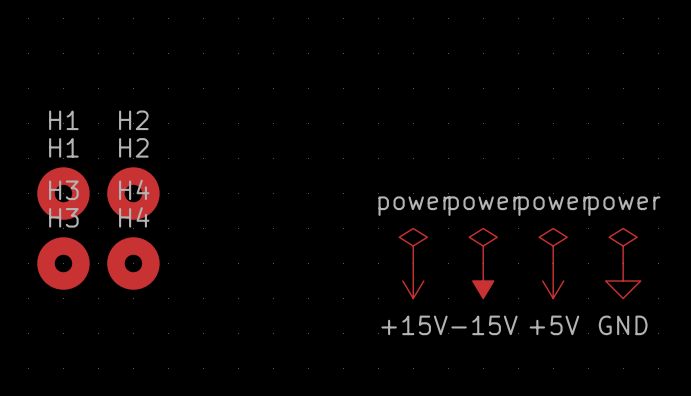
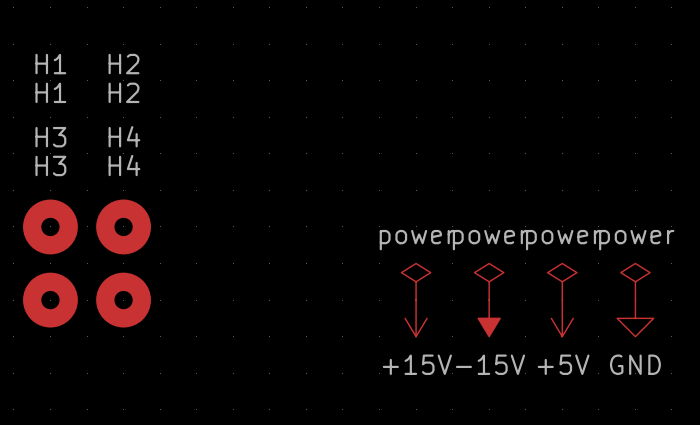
H1 name position: H1 (63, 120) -> H1 (50, 64)
H2 name position: H2 (133, 120) -> H2 (124, 64)
H1 value position: H1 (63, 147) -> H1 (50, 92)
H2 value position: H2 (133, 147) -> H2 (124, 92)
H4 name position: H4 (134, 189) -> H4 (124, 136)
H3 name position: H3 (63, 190) -> H3 (50, 137)
H3 value position: H3 (63, 217) -> H3 (50, 165)
H4 value position: H4 (134, 217) -> H4 (124, 165)

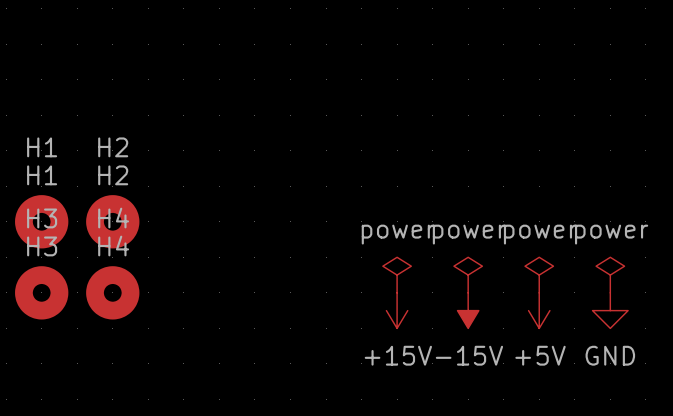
H1 name position: H1 (50, 64) -> H1 (42, 147)
H2 name position: H2 (124, 64) -> H2 (113, 147)
H1 value position: H1 (50, 92) -> H1 (42, 175)
H2 value position: H2 (124, 92) -> H2 (113, 175)
H4 name position: H4 (124, 136) -> H4 (113, 218)
H3 name position: H3 (50, 137) -> H3 (42, 218)
H3 value position: H3 (50, 165) -> H3 (42, 246)
H4 value position: H4 (124, 165) -> H4 (113, 246)

